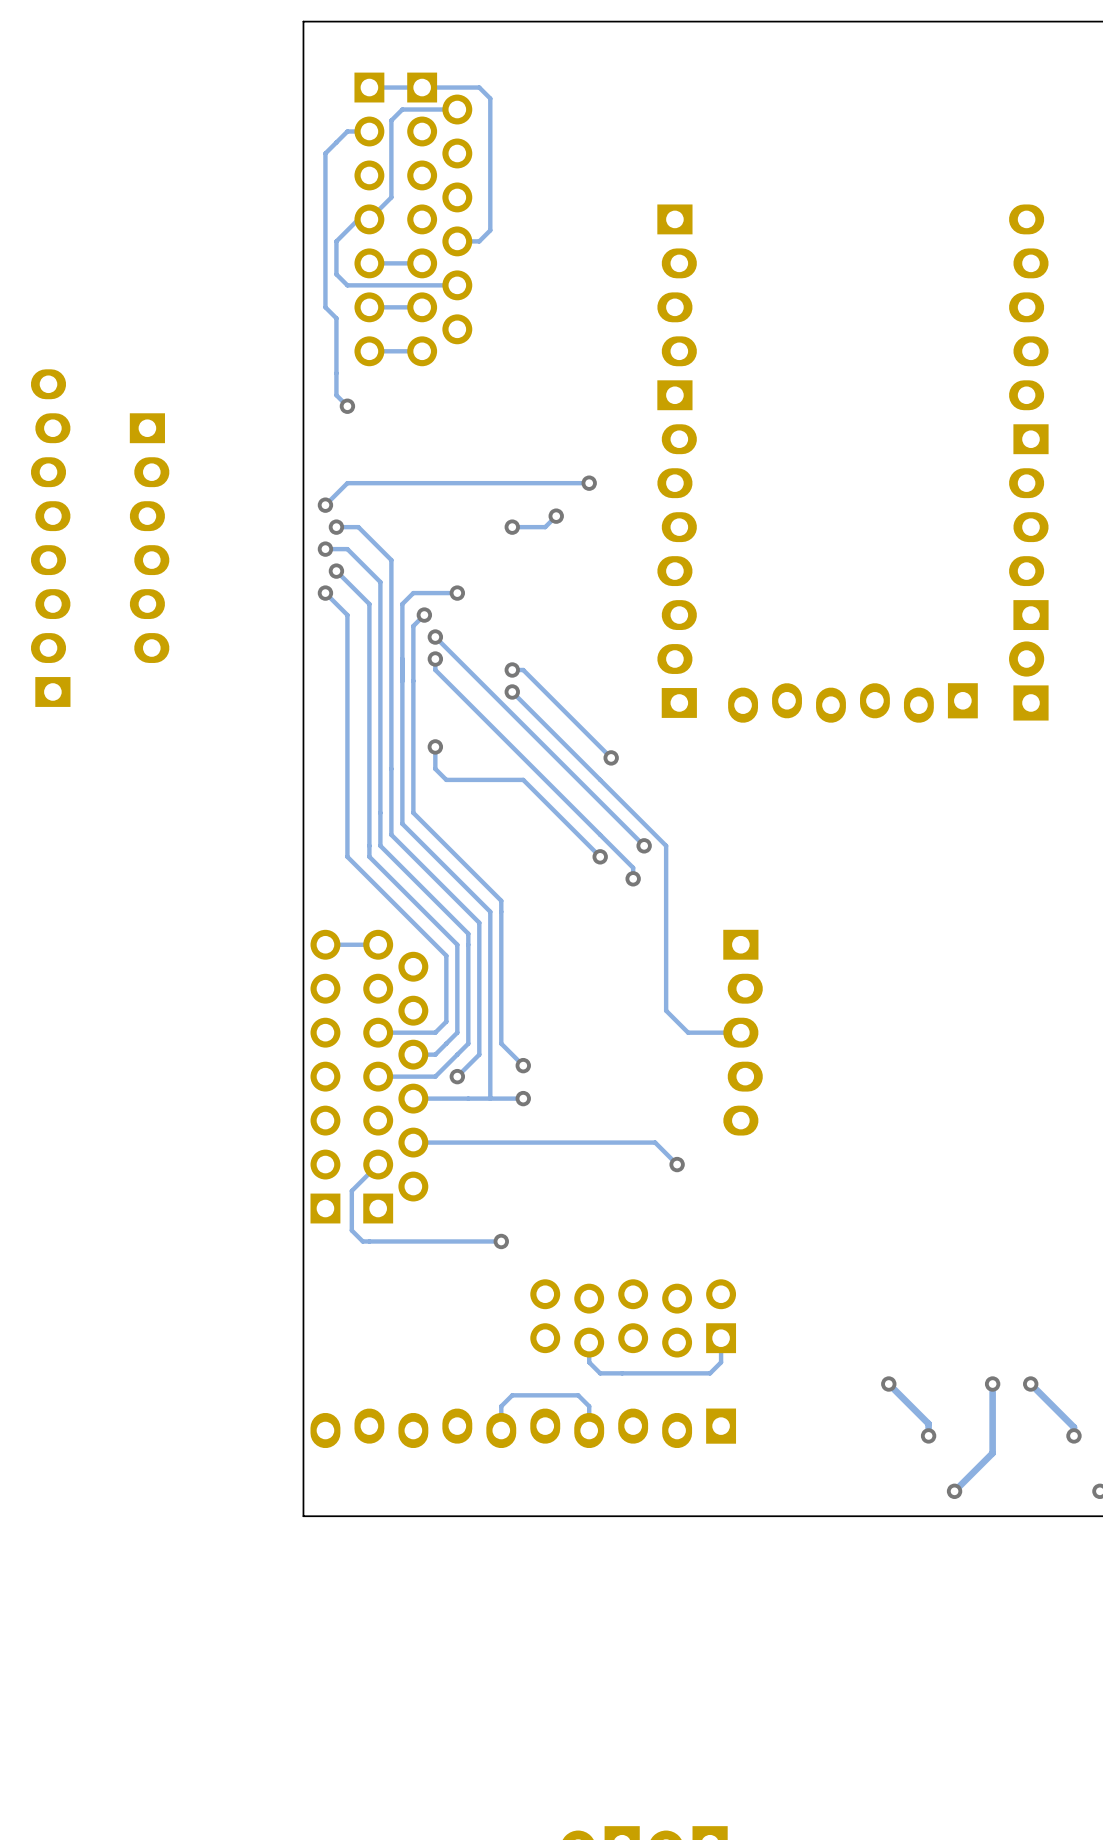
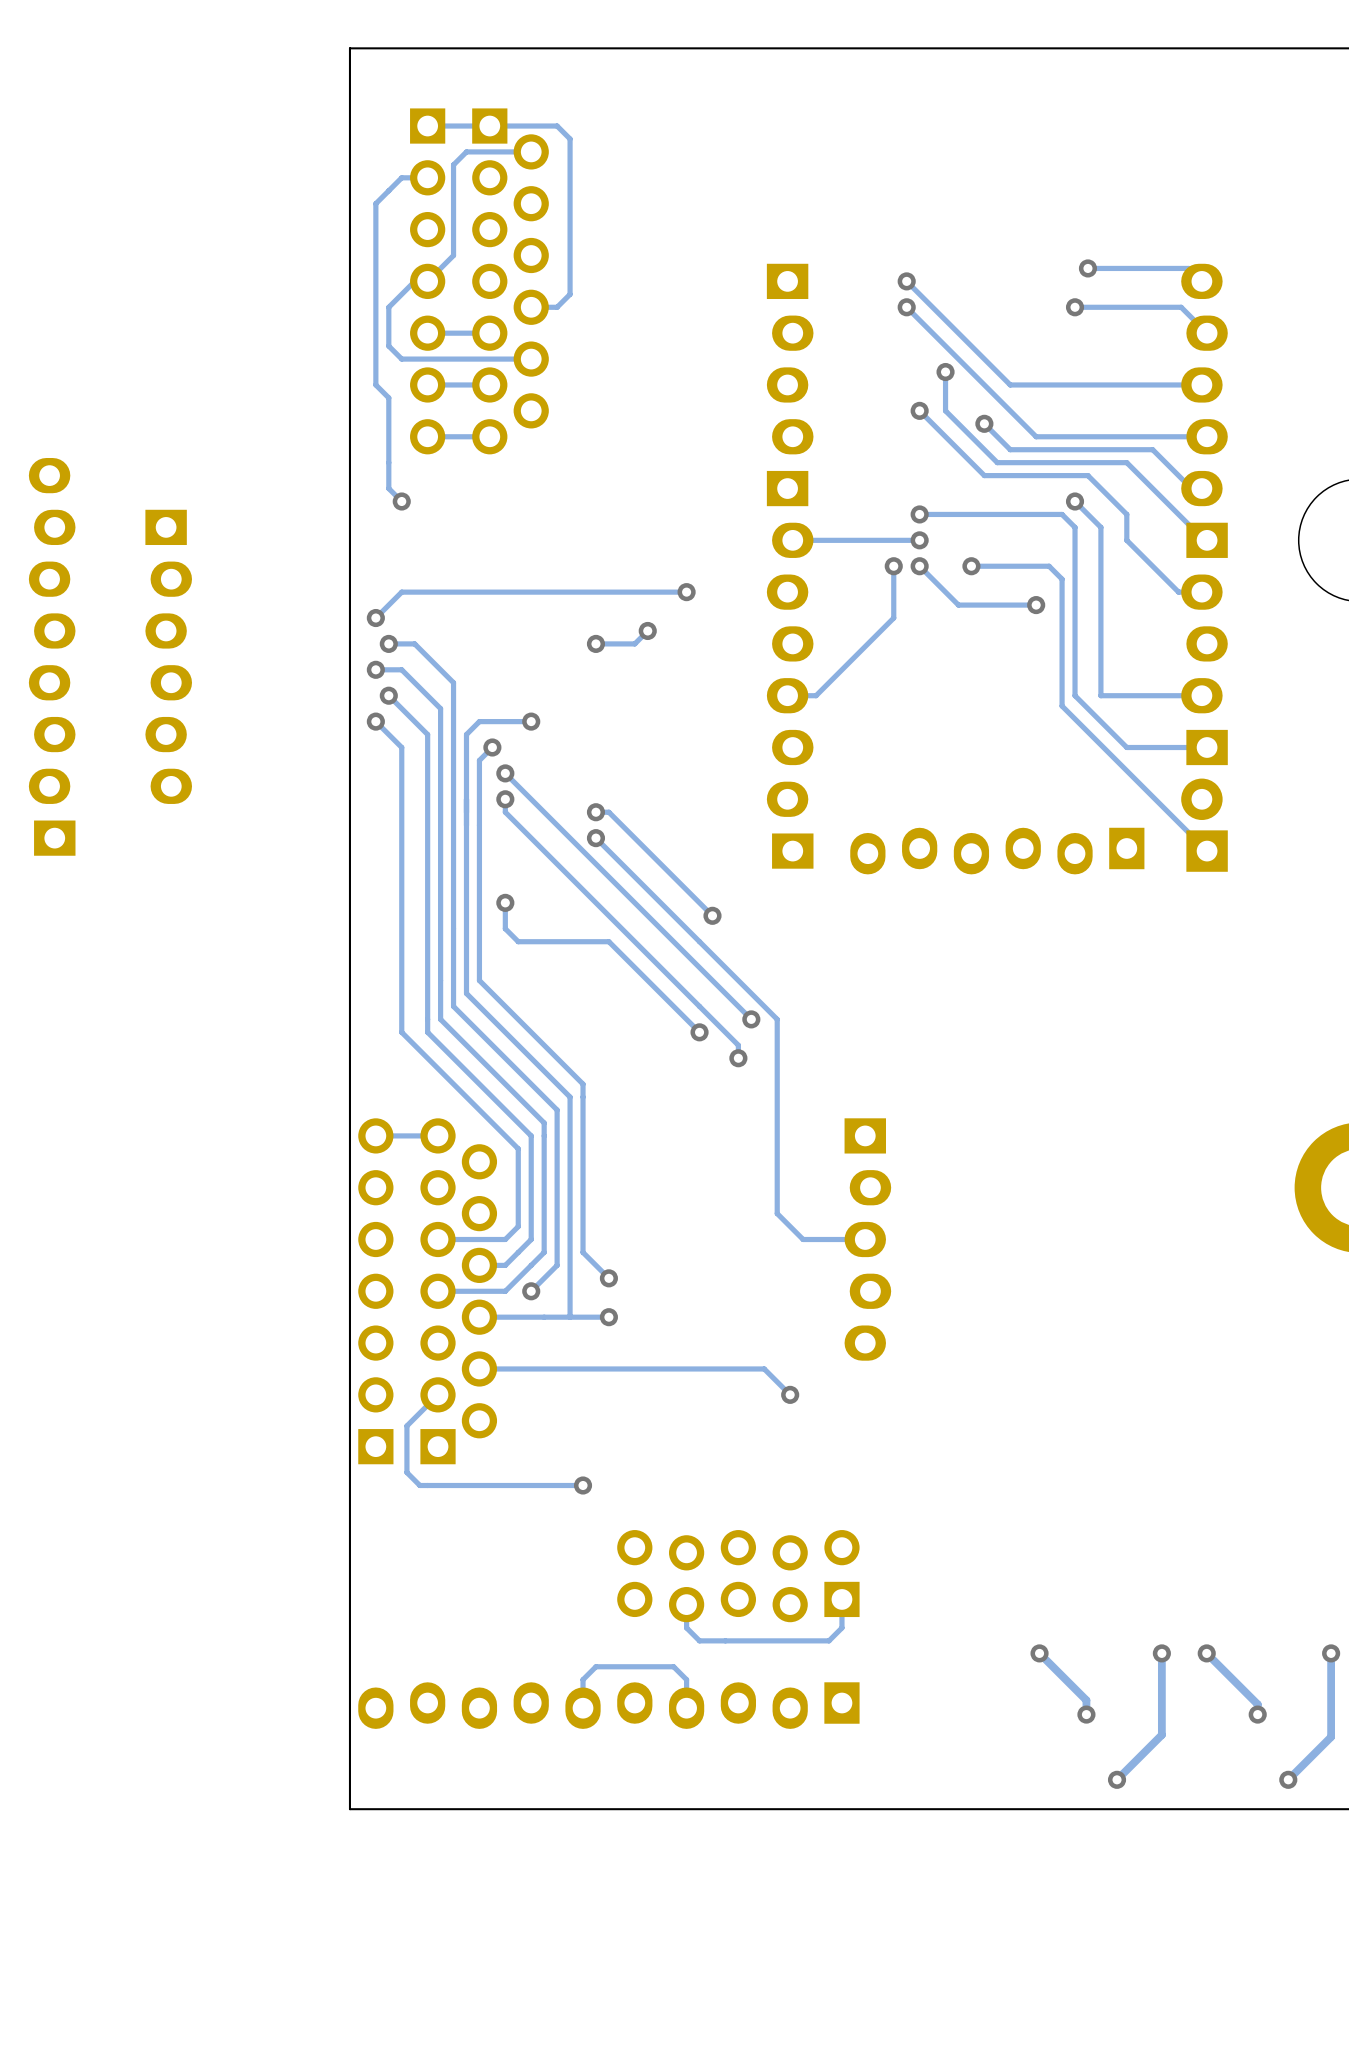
track: none -> (1087, 268) (1188, 268) (1201, 281)
via: none -> (1087, 268)
track: none -> (906, 281) (1010, 384) (1201, 384)
via: none -> (906, 281)
track: none -> (906, 307) (1036, 436) (1207, 436)
via: none -> (906, 307)
track: none -> (1075, 307) (1181, 307) (1207, 333)
via: none -> (1075, 307)
track: none -> (945, 372) (945, 410) (997, 462) (1126, 462) (1204, 540) (1207, 540)
via: none -> (945, 372)
track: none -> (919, 410) (984, 475) (1087, 475) (1126, 514) (1126, 540) (1178, 592) (1201, 592)
via: none -> (919, 410)
track: none -> (984, 423) (1010, 449) (1152, 449) (1191, 488) (1201, 488)
via: none -> (984, 423)
track: none -> (1075, 501) (1100, 527) (1100, 695) (1201, 695)
via: none -> (1075, 501)
track: none -> (919, 514) (1062, 514) (1075, 527) (1075, 695) (1126, 747) (1207, 747)
via: none -> (919, 514)
track: none -> (919, 540) (792, 540)
via: none -> (919, 540)
track: none -> (893, 566) (893, 618) (816, 695) (787, 695)
via: none -> (893, 566)
track: none -> (919, 566) (958, 605) (1036, 605)
via: none -> (919, 566)
track: none -> (971, 566) (1049, 566) (1062, 579) (1062, 706) (1207, 851)
via: none -> (971, 566)
via: none -> (1036, 605)

